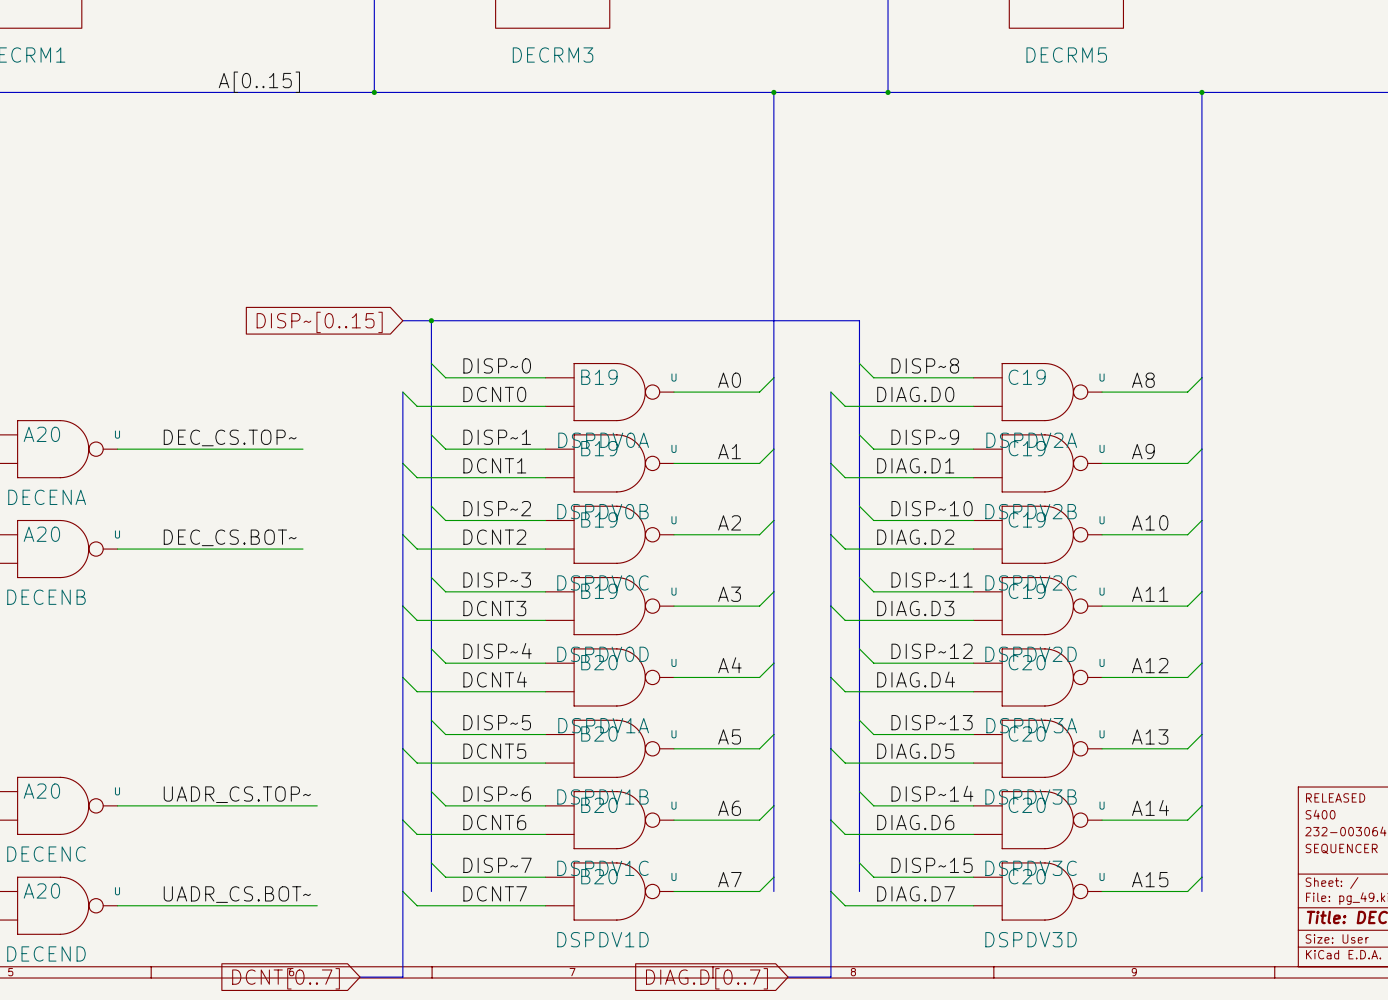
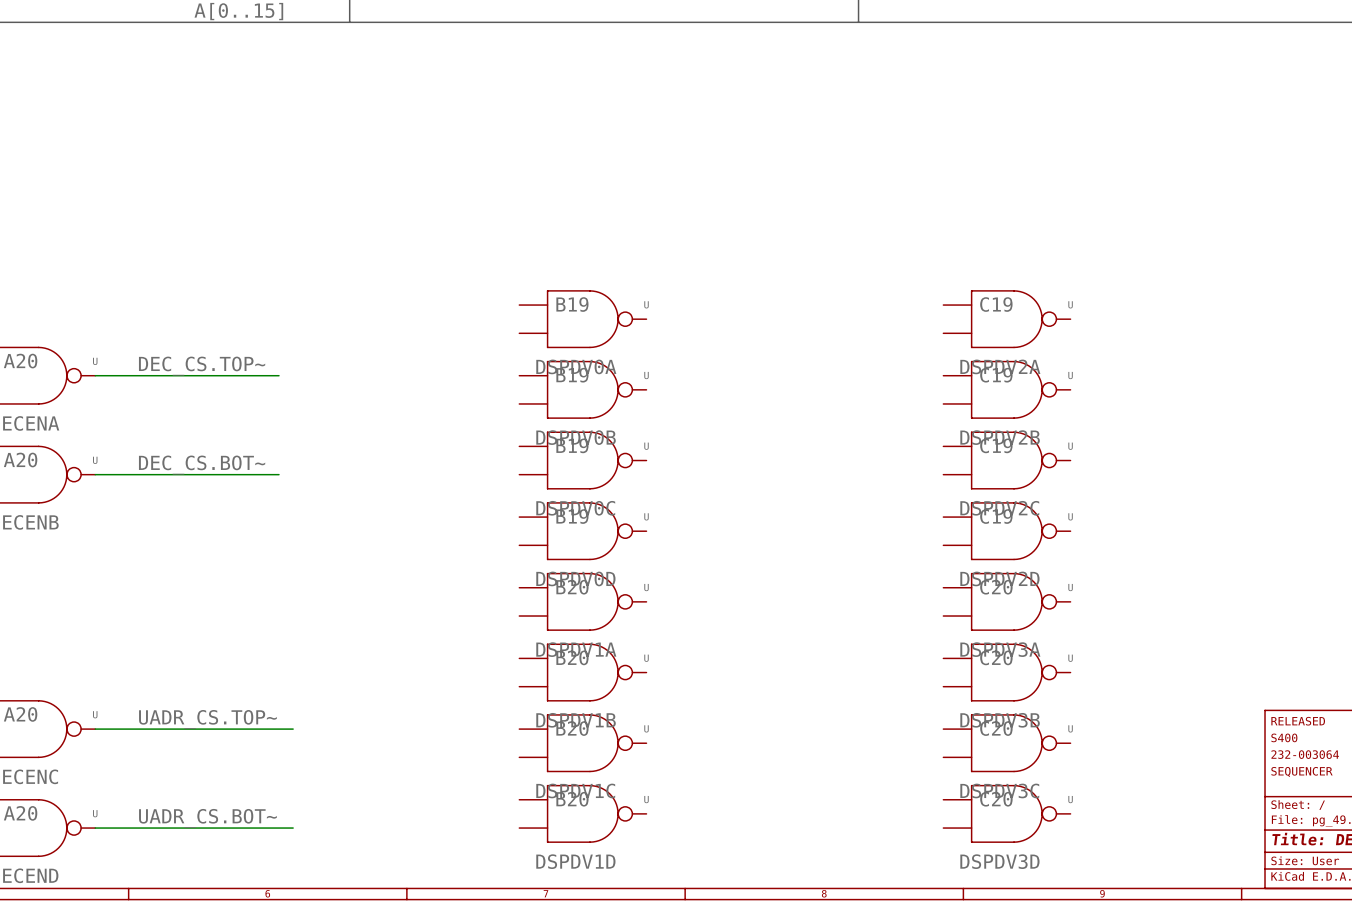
junction: (374, 92) -> none
bus: (773, 92) (773, 891) -> none
junction: (773, 92) -> none
junction: (888, 92) -> none
bus: (1201, 92) (1201, 891) -> none
junction: (1201, 92) -> none
bus: (402, 320) (859, 320) (859, 891) -> none
bus: (431, 320) (431, 891) -> none
junction: (431, 320) -> none
global label: DISP~[0..15] (319, 322) -> none
wire: (431, 363) (445, 377) (545, 377) -> none
wire: (859, 363) (873, 377) (973, 377) -> none
label: DISP~0 (497, 365) -> none
label: DISP~8 (925, 365) -> none
wire: (773, 377) (759, 392) (673, 392) -> none
wire: (1201, 377) (1187, 392) (1102, 392) -> none
label: A0 (729, 380) -> none
label: A8 (1143, 380) -> none
wire: (402, 392) (417, 406) (545, 406) -> none
bus: (402, 392) (402, 977) (360, 977) -> none
wire: (830, 392) (845, 406) (973, 406) -> none
bus: (830, 392) (830, 977) (788, 977) -> none
label: DCNT0 (494, 394) -> none
label: DIAG.D0 (915, 394) -> none
wire: (431, 434) (445, 449) (545, 449) -> none
wire: (859, 434) (873, 449) (973, 449) -> none
label: DISP~1 (497, 437) -> none
label: DISP~9 (925, 437) -> none
wire: (773, 449) (759, 463) (673, 463) -> none
wire: (1201, 449) (1187, 463) (1102, 463) -> none
label: A1 (729, 451) -> none
label: A9 (1143, 451) -> none
wire: (402, 463) (417, 477) (545, 477) -> none
wire: (830, 463) (845, 477) (973, 477) -> none
label: DCNT1 (494, 465) -> none
label: DIAG.D1 (915, 465) -> none
wire: (431, 506) (445, 520) (545, 520) -> none
wire: (859, 506) (873, 520) (973, 520) -> none
label: DISP~2 (497, 508) -> none
label: DISP~10 (932, 508) -> none
wire: (773, 520) (759, 534) (673, 534) -> none
wire: (1201, 520) (1187, 534) (1102, 534) -> none
label: A2 (729, 522) -> none
label: A10 (1150, 522) -> none
wire: (402, 534) (417, 549) (545, 549) -> none
wire: (830, 534) (845, 549) (973, 549) -> none
label: DCNT2 (494, 537) -> none
label: DIAG.D2 (915, 537) -> none
wire: (431, 577) (445, 591) (545, 591) -> none
wire: (859, 577) (873, 591) (973, 591) -> none
label: DISP~3 (497, 579) -> none
label: DISP~11 (932, 579) -> none
wire: (773, 591) (759, 606) (673, 606) -> none
wire: (1201, 591) (1187, 606) (1102, 606) -> none
label: A3 (729, 594) -> none
label: A11 (1150, 594) -> none
wire: (402, 606) (417, 620) (545, 620) -> none
wire: (830, 606) (845, 620) (973, 620) -> none
label: DCNT3 (494, 608) -> none
label: DIAG.D3 (915, 608) -> none
wire: (431, 648) (445, 663) (545, 663) -> none
wire: (859, 648) (873, 663) (973, 663) -> none
label: DISP~4 (497, 650) -> none
label: DISP~12 (932, 651) -> none
wire: (773, 663) (759, 677) (673, 677) -> none
wire: (1201, 663) (1187, 677) (1102, 677) -> none
label: A4 (729, 665) -> none
label: A12 (1150, 665) -> none
wire: (402, 677) (417, 691) (545, 691) -> none
wire: (830, 677) (845, 691) (973, 691) -> none
label: DCNT4 (495, 679) -> none
label: DIAG.D4 (916, 679) -> none
wire: (431, 720) (445, 734) (545, 734) -> none
wire: (859, 720) (873, 734) (973, 734) -> none
label: DISP~5 (497, 722) -> none
label: DISP~13 (932, 722) -> none
wire: (773, 734) (759, 748) (673, 748) -> none
wire: (1201, 734) (1187, 748) (1102, 748) -> none
label: A5 (729, 736) -> none
label: A13 (1150, 736) -> none
wire: (402, 748) (417, 763) (545, 763) -> none
wire: (830, 748) (845, 763) (973, 763) -> none
label: DCNT5 (494, 751) -> none
label: DIAG.D5 (915, 751) -> none
wire: (431, 791) (445, 805) (545, 805) -> none
wire: (859, 791) (873, 805) (973, 805) -> none
label: DISP~14 (932, 793) -> none
label: DISP~6 (497, 794) -> none
wire: (773, 805) (759, 820) (673, 820) -> none
wire: (1201, 805) (1187, 820) (1102, 820) -> none
label: A14 (1150, 807) -> none
label: A6 (729, 808) -> none
wire: (402, 820) (417, 834) (545, 834) -> none
wire: (830, 820) (845, 834) (973, 834) -> none
label: DCNT6 (494, 822) -> none
label: DIAG.D6 (915, 822) -> none
wire: (431, 862) (445, 877) (545, 877) -> none
wire: (859, 862) (873, 877) (973, 877) -> none
label: DISP~7 (497, 865) -> none
label: DISP~15 (932, 865) -> none
wire: (773, 877) (759, 891) (673, 891) -> none
wire: (1201, 877) (1187, 891) (1102, 891) -> none
label: A7 (729, 879) -> none
label: A15 (1150, 879) -> none
wire: (402, 891) (417, 905) (545, 905) -> none
wire: (830, 891) (845, 905) (973, 905) -> none
label: DCNT7 (495, 893) -> none
label: DIAG.D7 (916, 893) -> none
global label: DCNT[0..7] (286, 978) -> none
global label: DIAG.D[0..7] (706, 978) -> none

